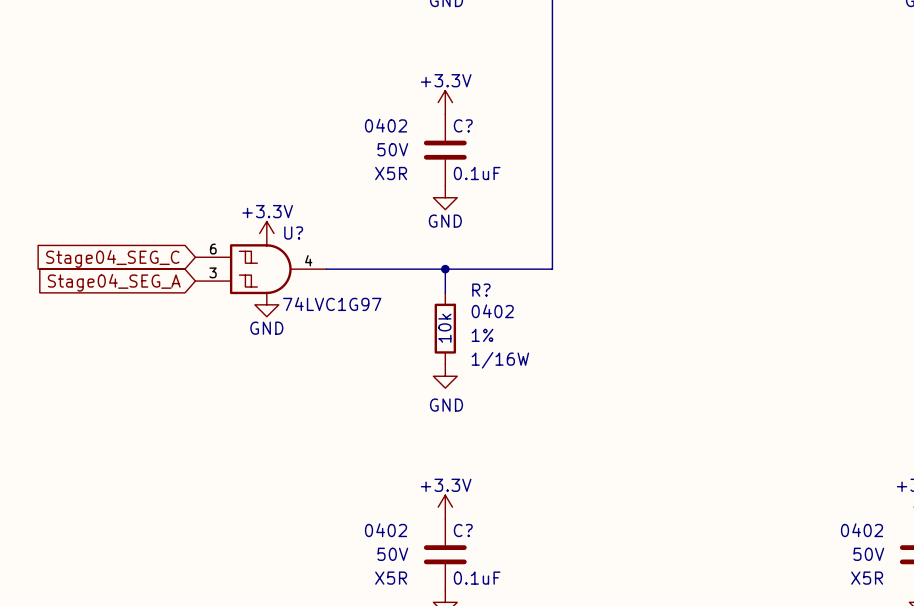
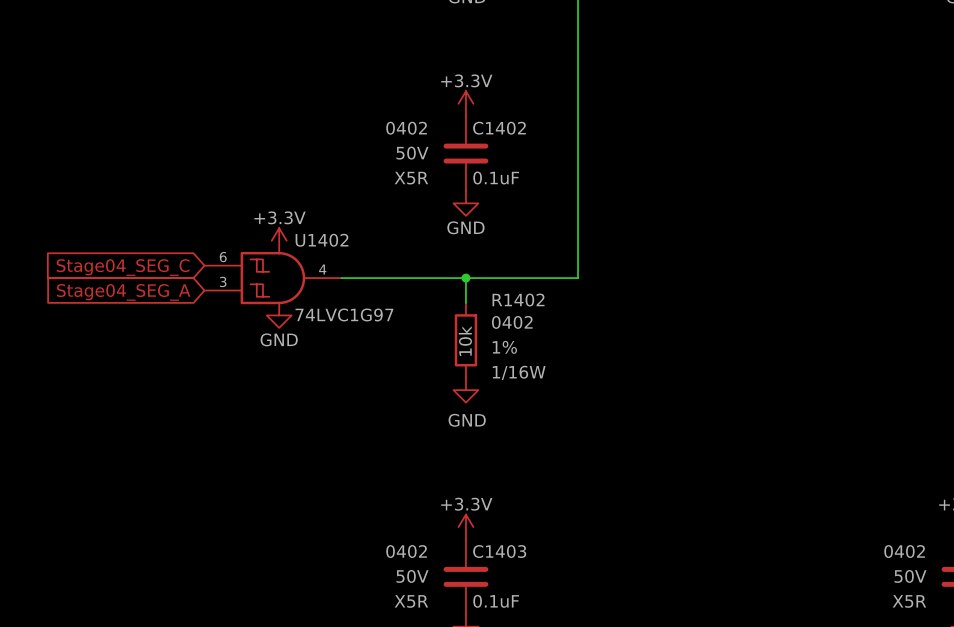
C? name: C? (463, 125) -> C1402 (499, 128)
U? name: U? (293, 233) -> U1402 (322, 240)
R? name: R? (481, 290) -> R1402 (518, 300)
C? name: C? (463, 530) -> C1403 (499, 551)

